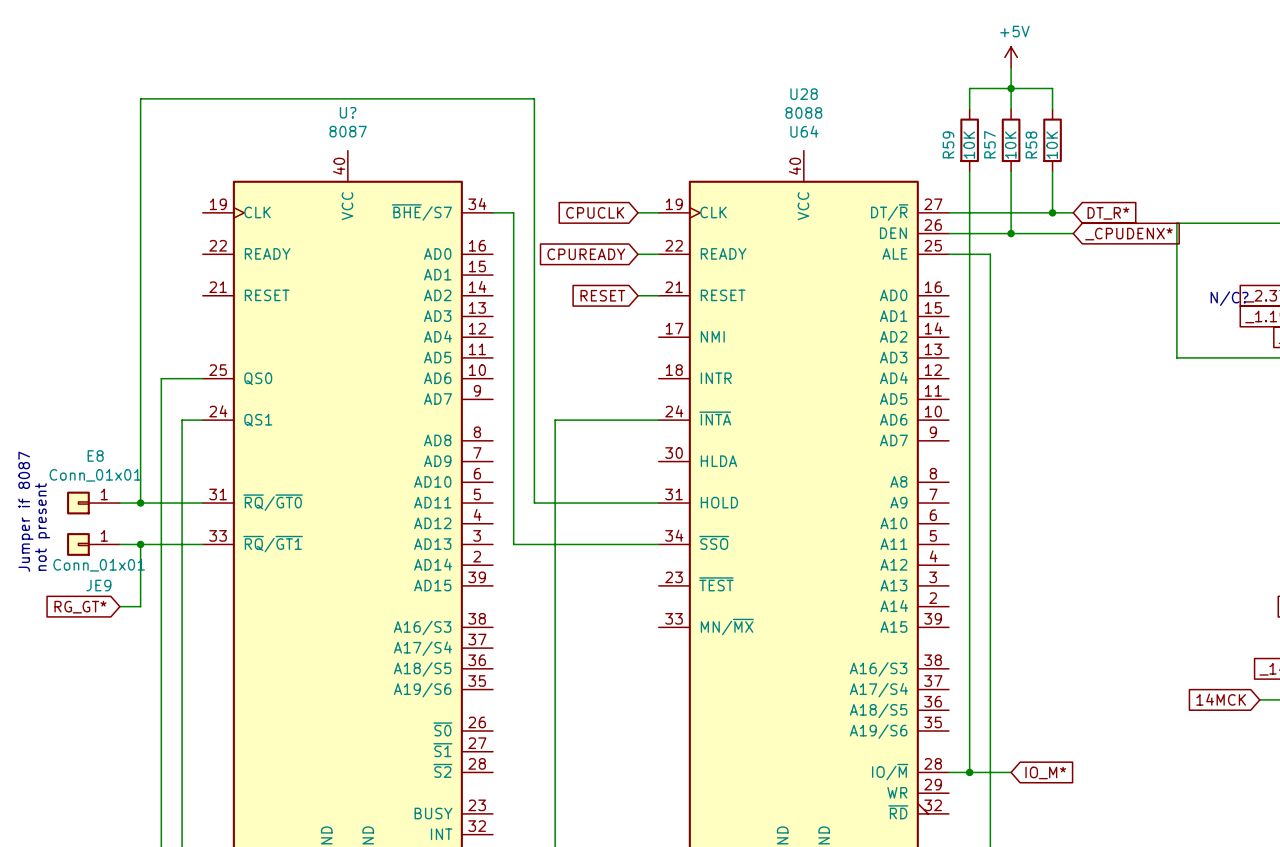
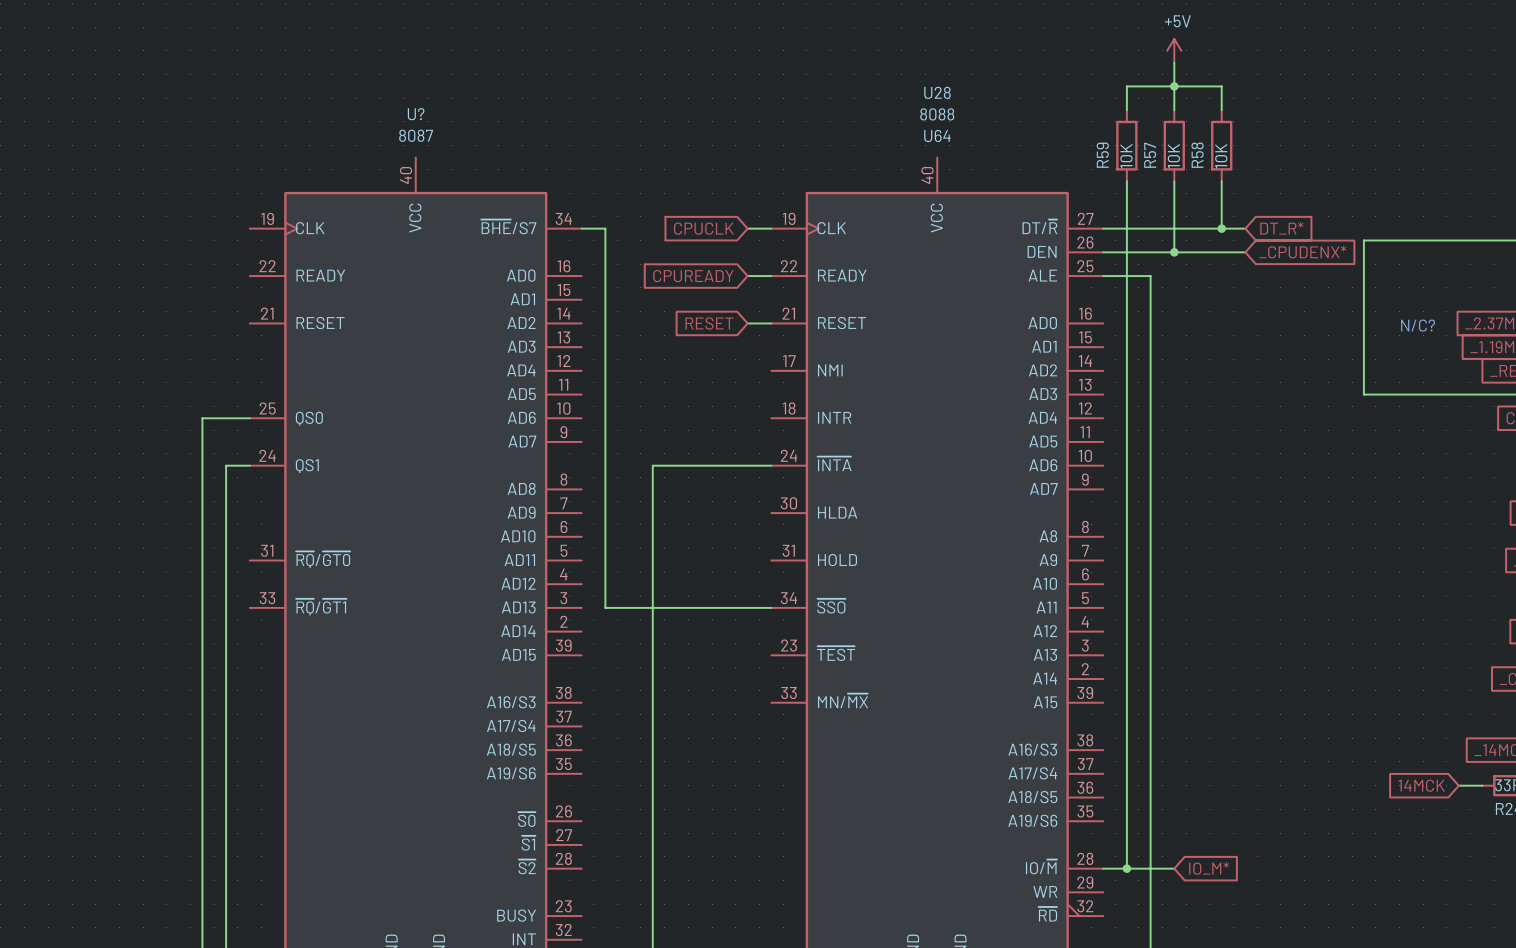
E8: Conn_01x01 (93, 503) -> none
wire: (119, 503) (202, 503) -> none
wire: (140, 503) (140, 98) (534, 98) (534, 503) (658, 503) -> none
junction: (140, 503) -> none
text: Jumper if 8087 (25, 511) -> none
text: not present (42, 527) -> none
JE9: Conn_01x01 (93, 544) -> none
wire: (119, 544) (202, 544) -> none
wire: (140, 544) (140, 606) (119, 606) -> none
junction: (140, 544) -> none
global label: RG_GT* (80, 607) -> none

